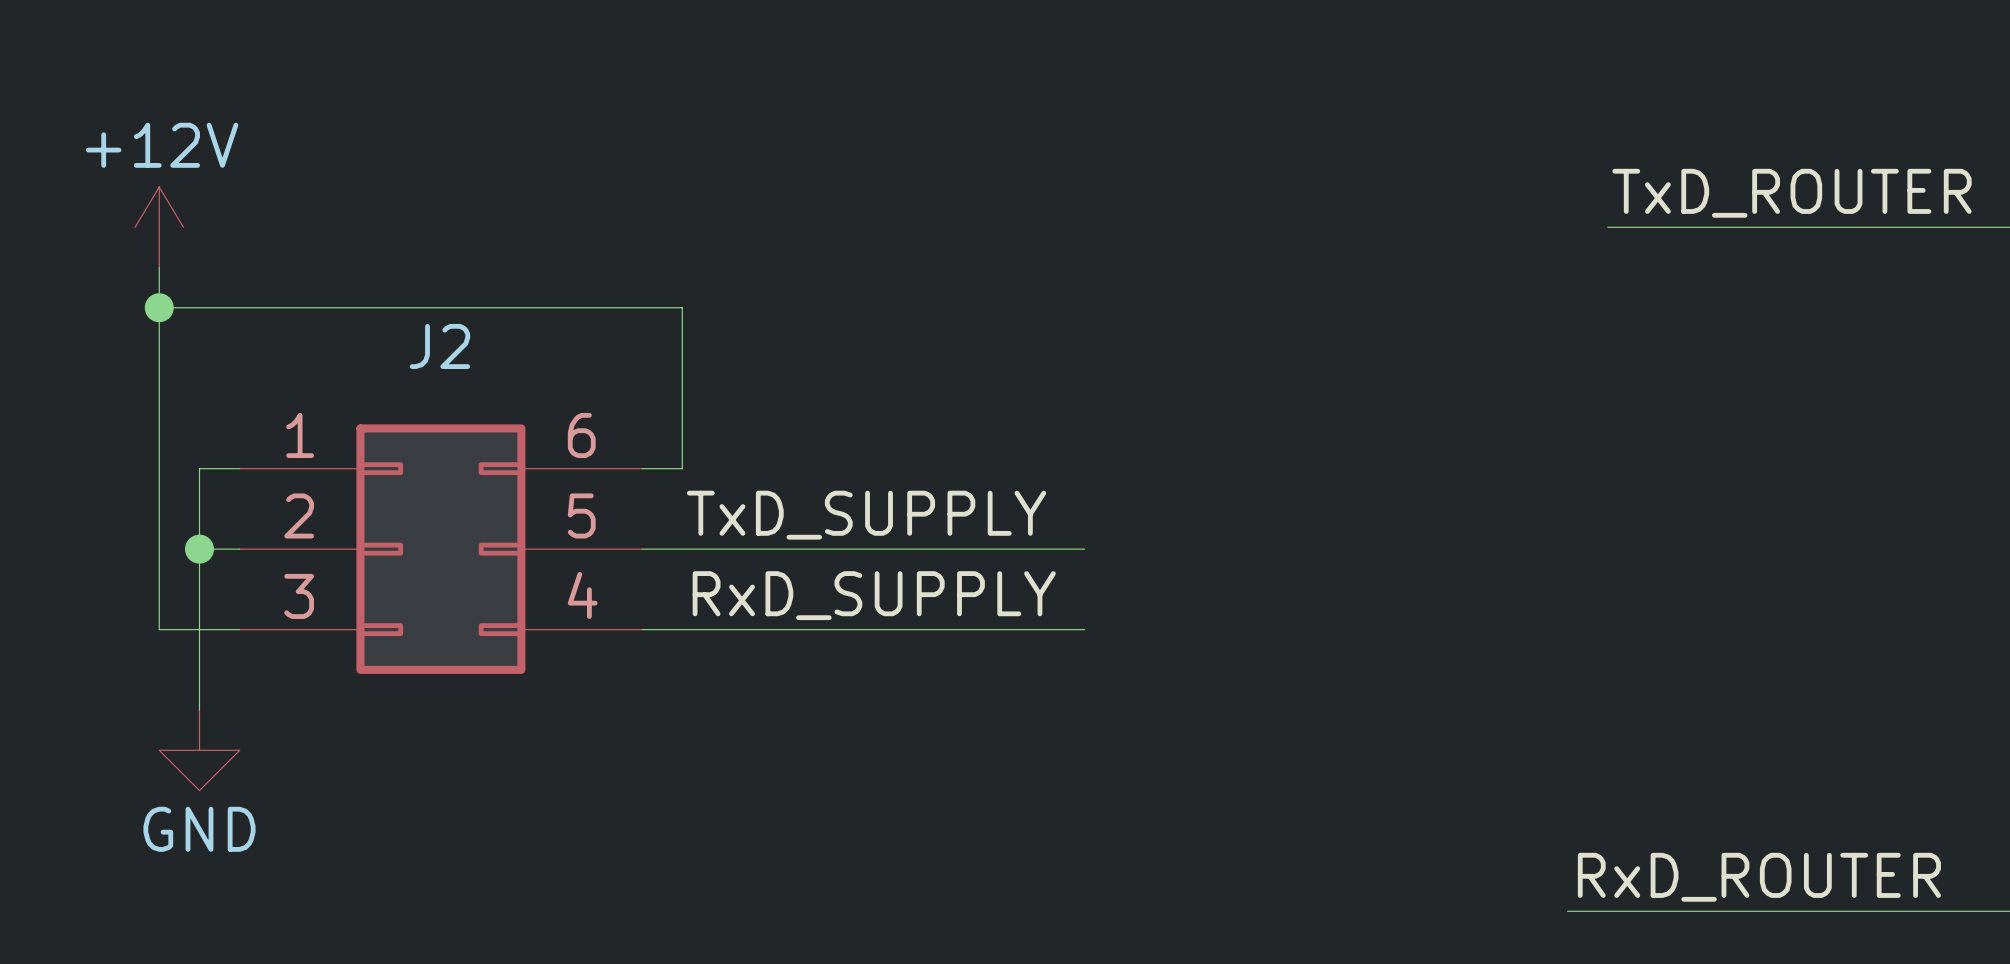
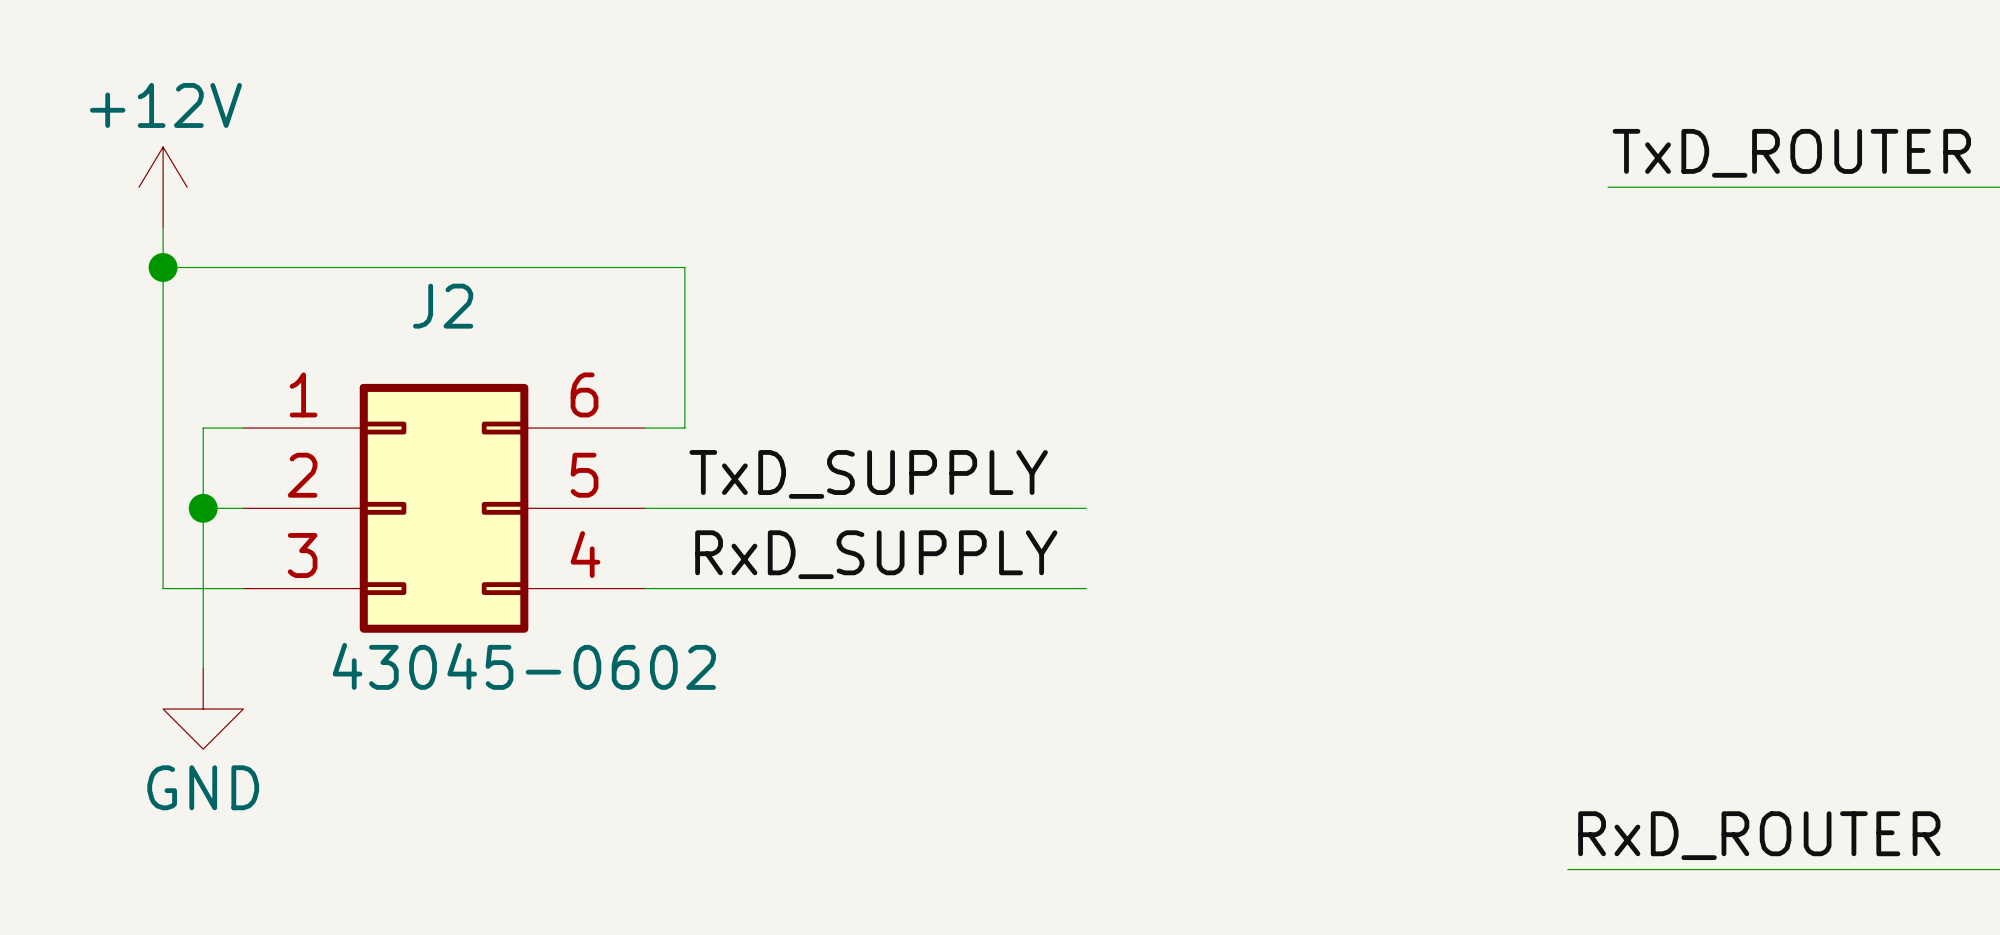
J2 text: none -> 43045-0602 (524, 666)

